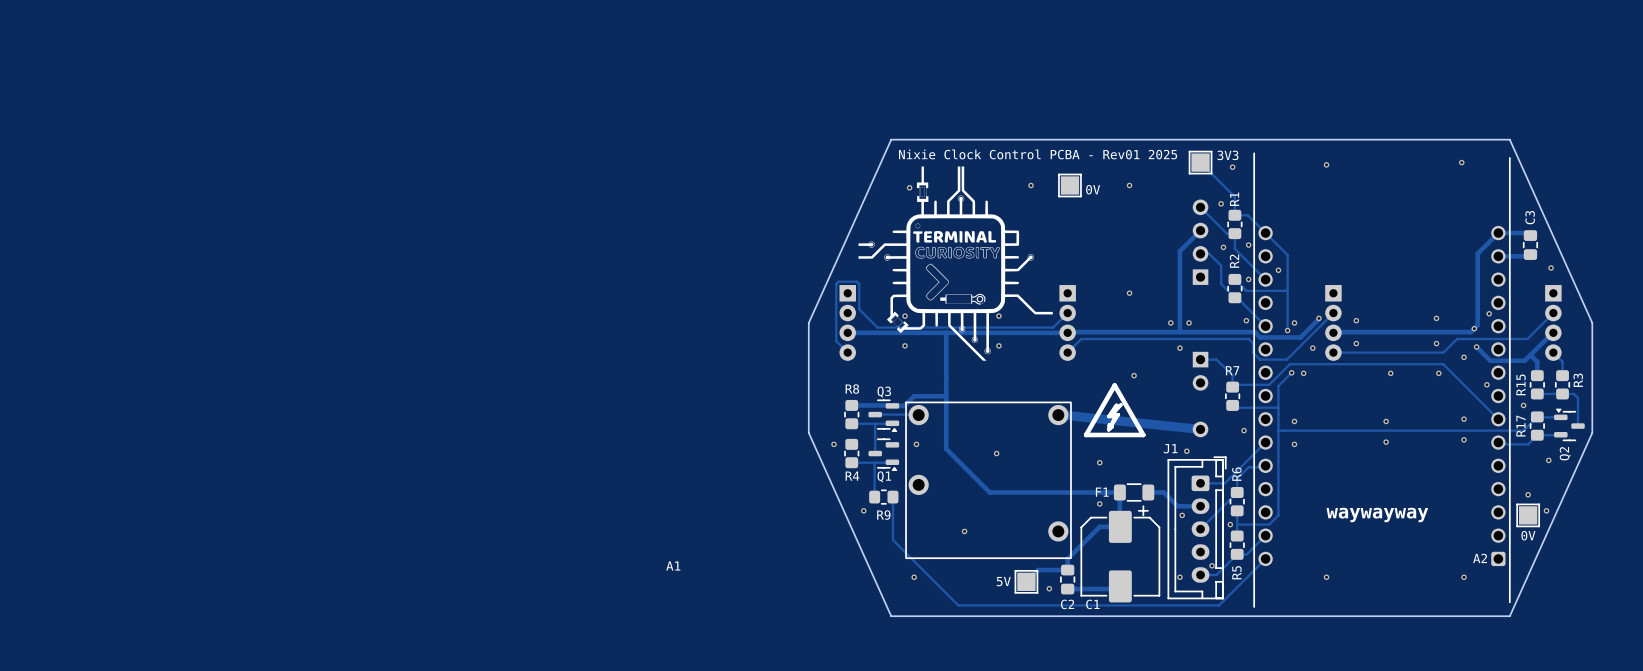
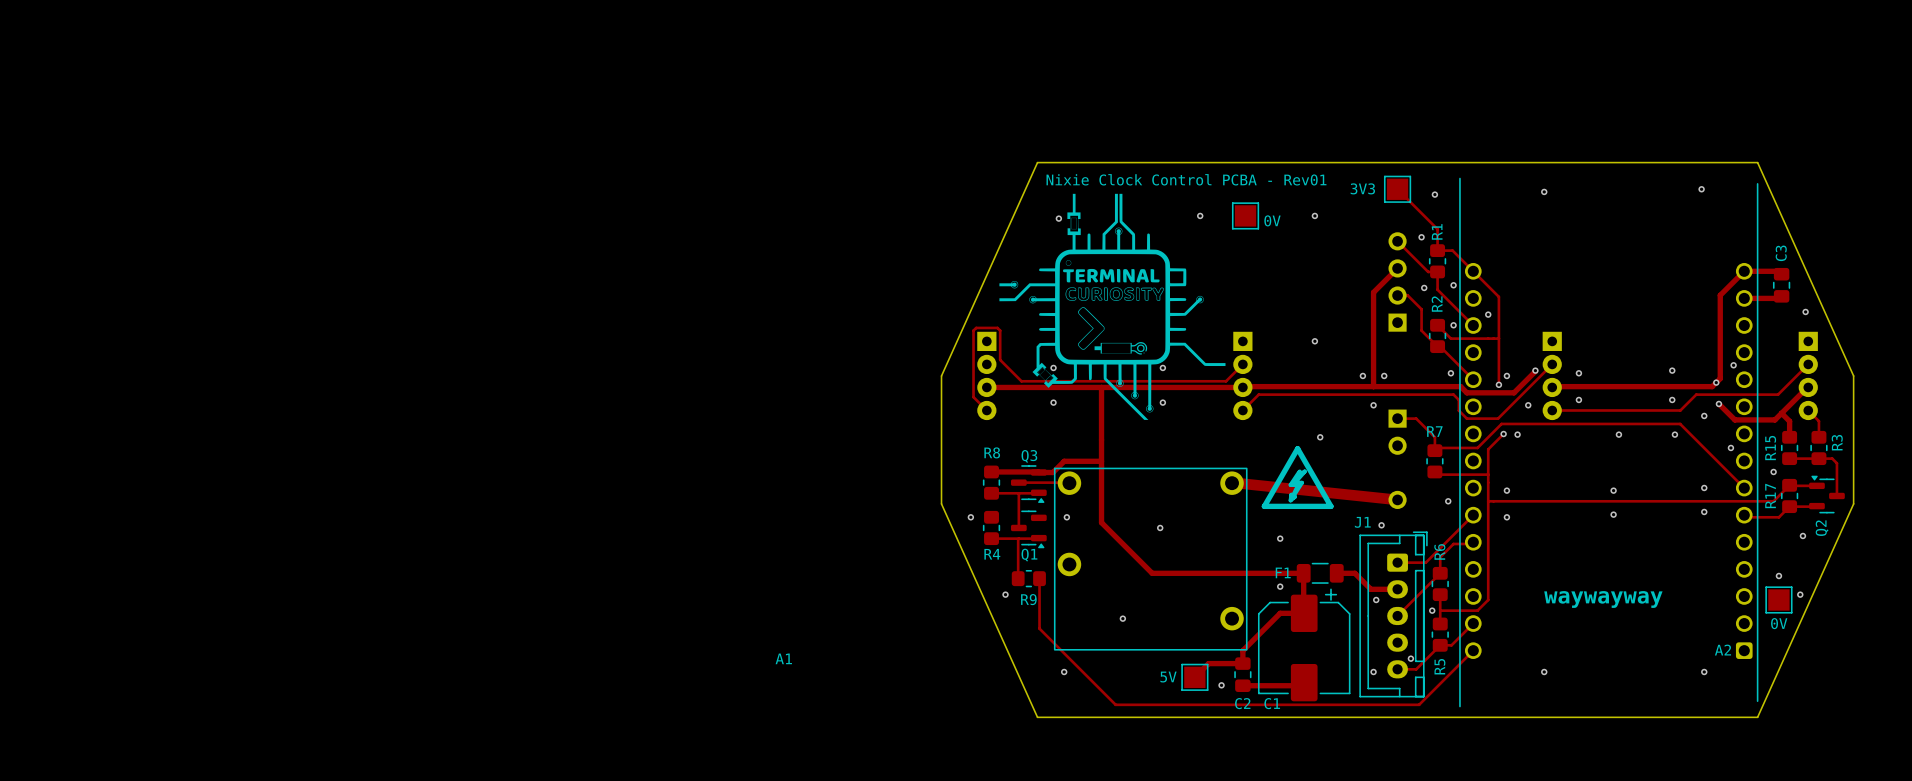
text: 2025 (1162, 154) -> none
part value position: 3V3 (1227, 155) -> 3V3 (1362, 188)

